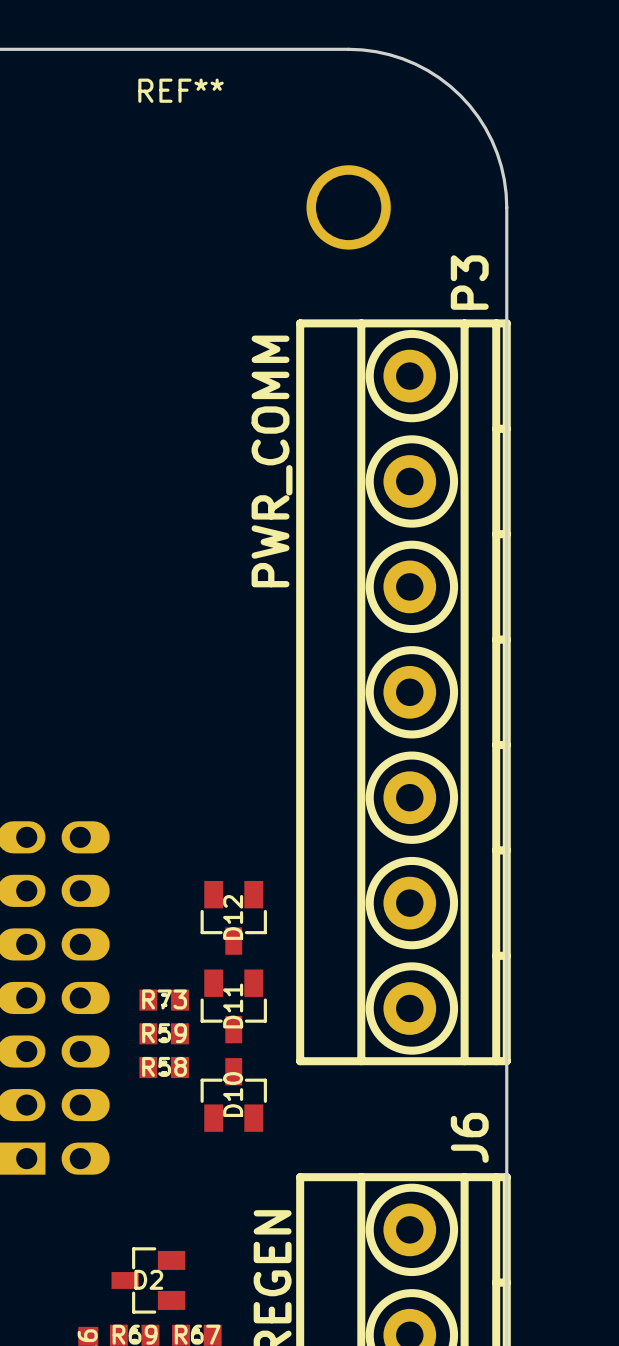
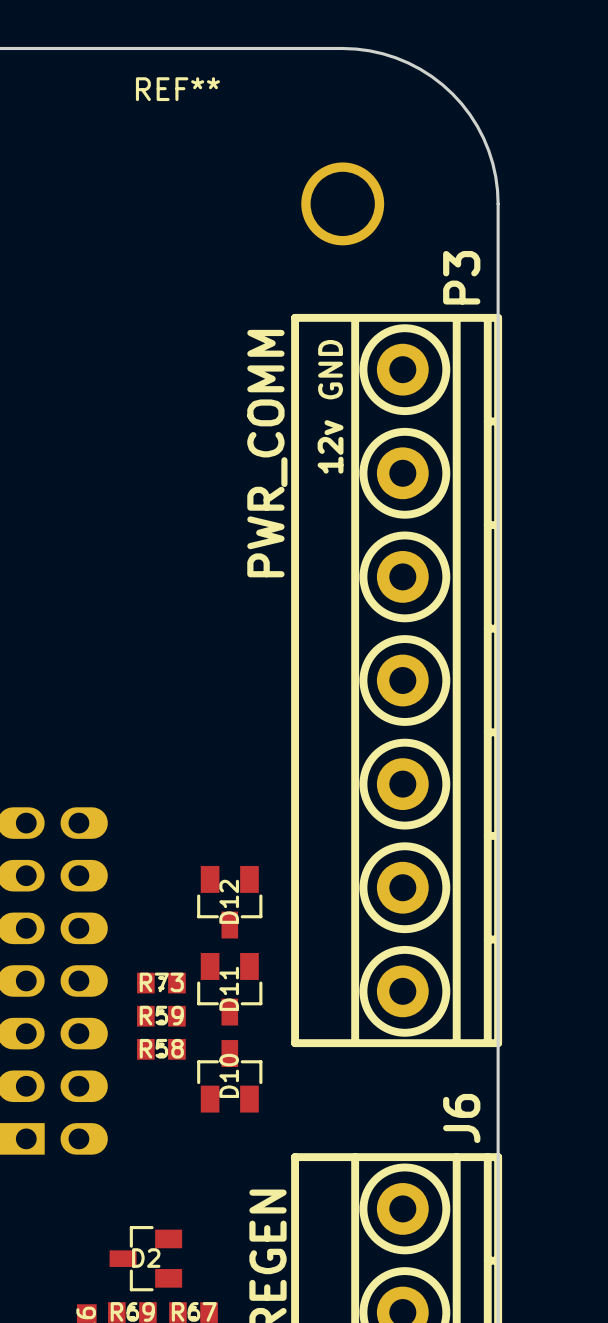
text: none -> GND (330, 369)
text: none -> 12v (330, 446)

